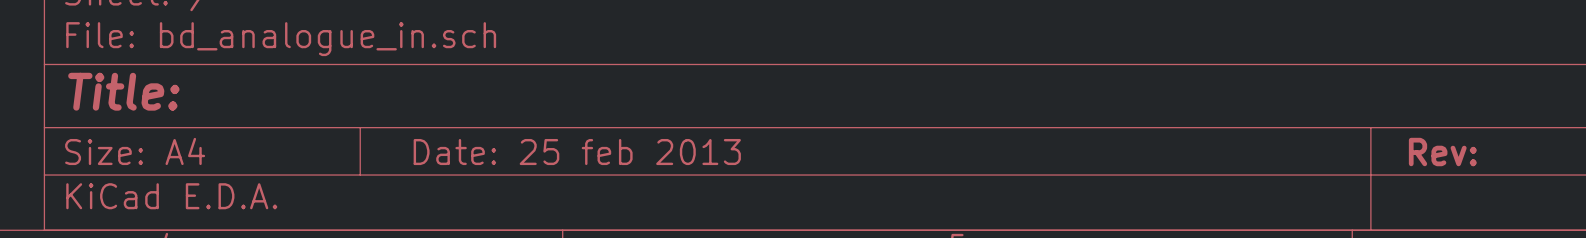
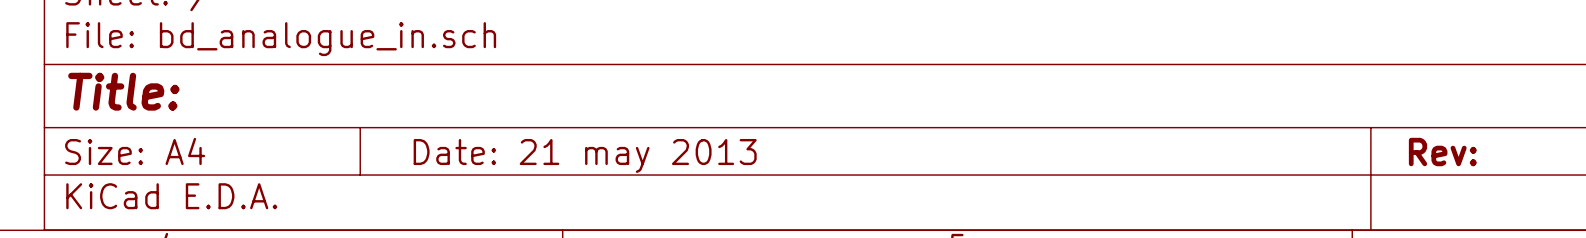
title block: Date: 25 feb 2013 (577, 152) -> Date: 21 may 2013 (585, 155)

